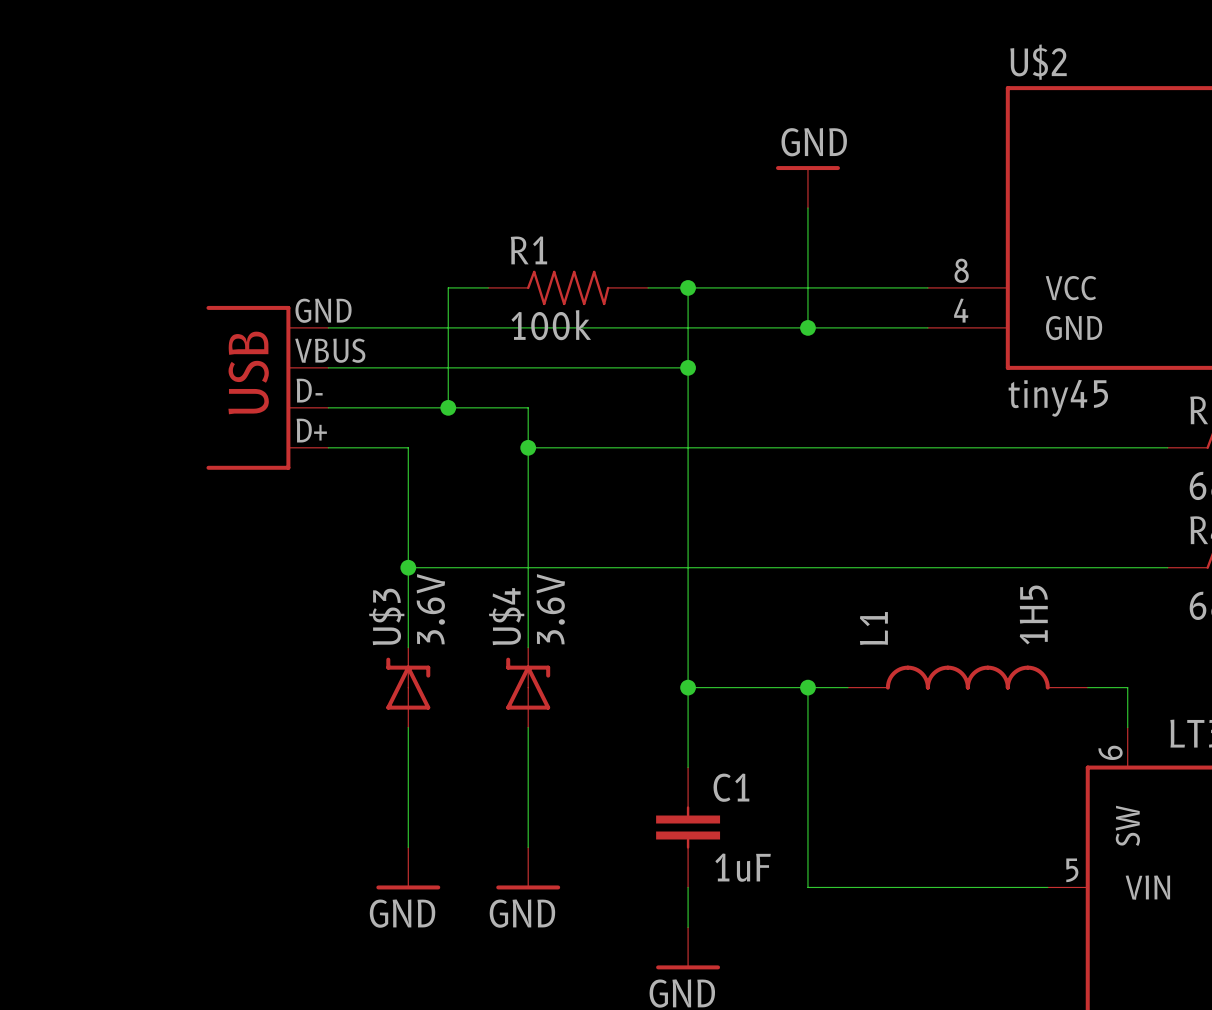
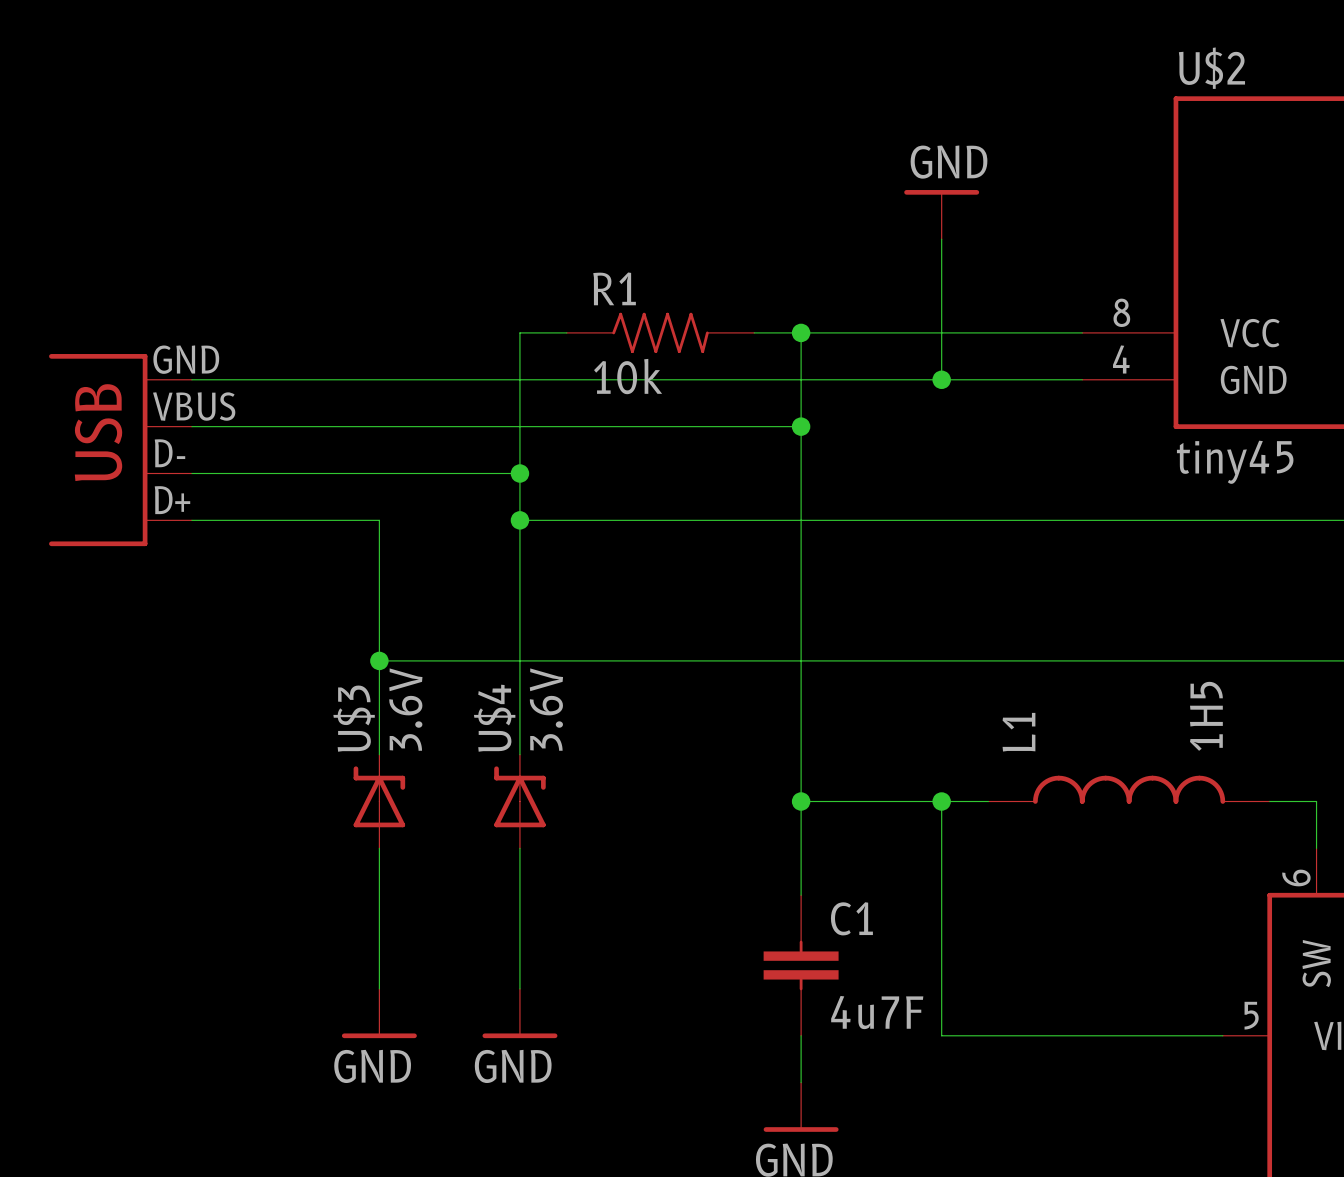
R1 value: 100k (551, 325) -> 10k (628, 376)
wire: none -> (191, 379) (379, 379)
wire: none -> (191, 426) (379, 426)
part position: (267, 387) -> (120, 450)
wire: none -> (191, 473) (379, 473)
wire: (448, 407) (528, 407) (528, 647) -> (519, 473) (519, 754)
wire: none -> (191, 520) (379, 520) (379, 754)
wire: (328, 447) (408, 447) (408, 647) -> none
wire: none -> (519, 520) (613, 520)
junction: none -> (519, 520)
junction: (528, 447) -> none
wire: none -> (379, 660) (473, 660)
junction: none -> (379, 660)
junction: (408, 567) -> none
U$3 position: (408, 687) -> (379, 801)
U$4 position: (528, 687) -> (519, 801)
wire: (408, 727) (408, 847) -> (379, 848) (379, 988)
wire: (528, 727) (528, 847) -> (519, 848) (519, 988)
C1 value: 1uF (743, 867) -> 4u7F (877, 1012)
power symbol: none -> GND (379, 1013)
power symbol: GND (408, 868) -> none
power symbol: none -> GND (519, 1013)
power symbol: GND (528, 868) -> none

